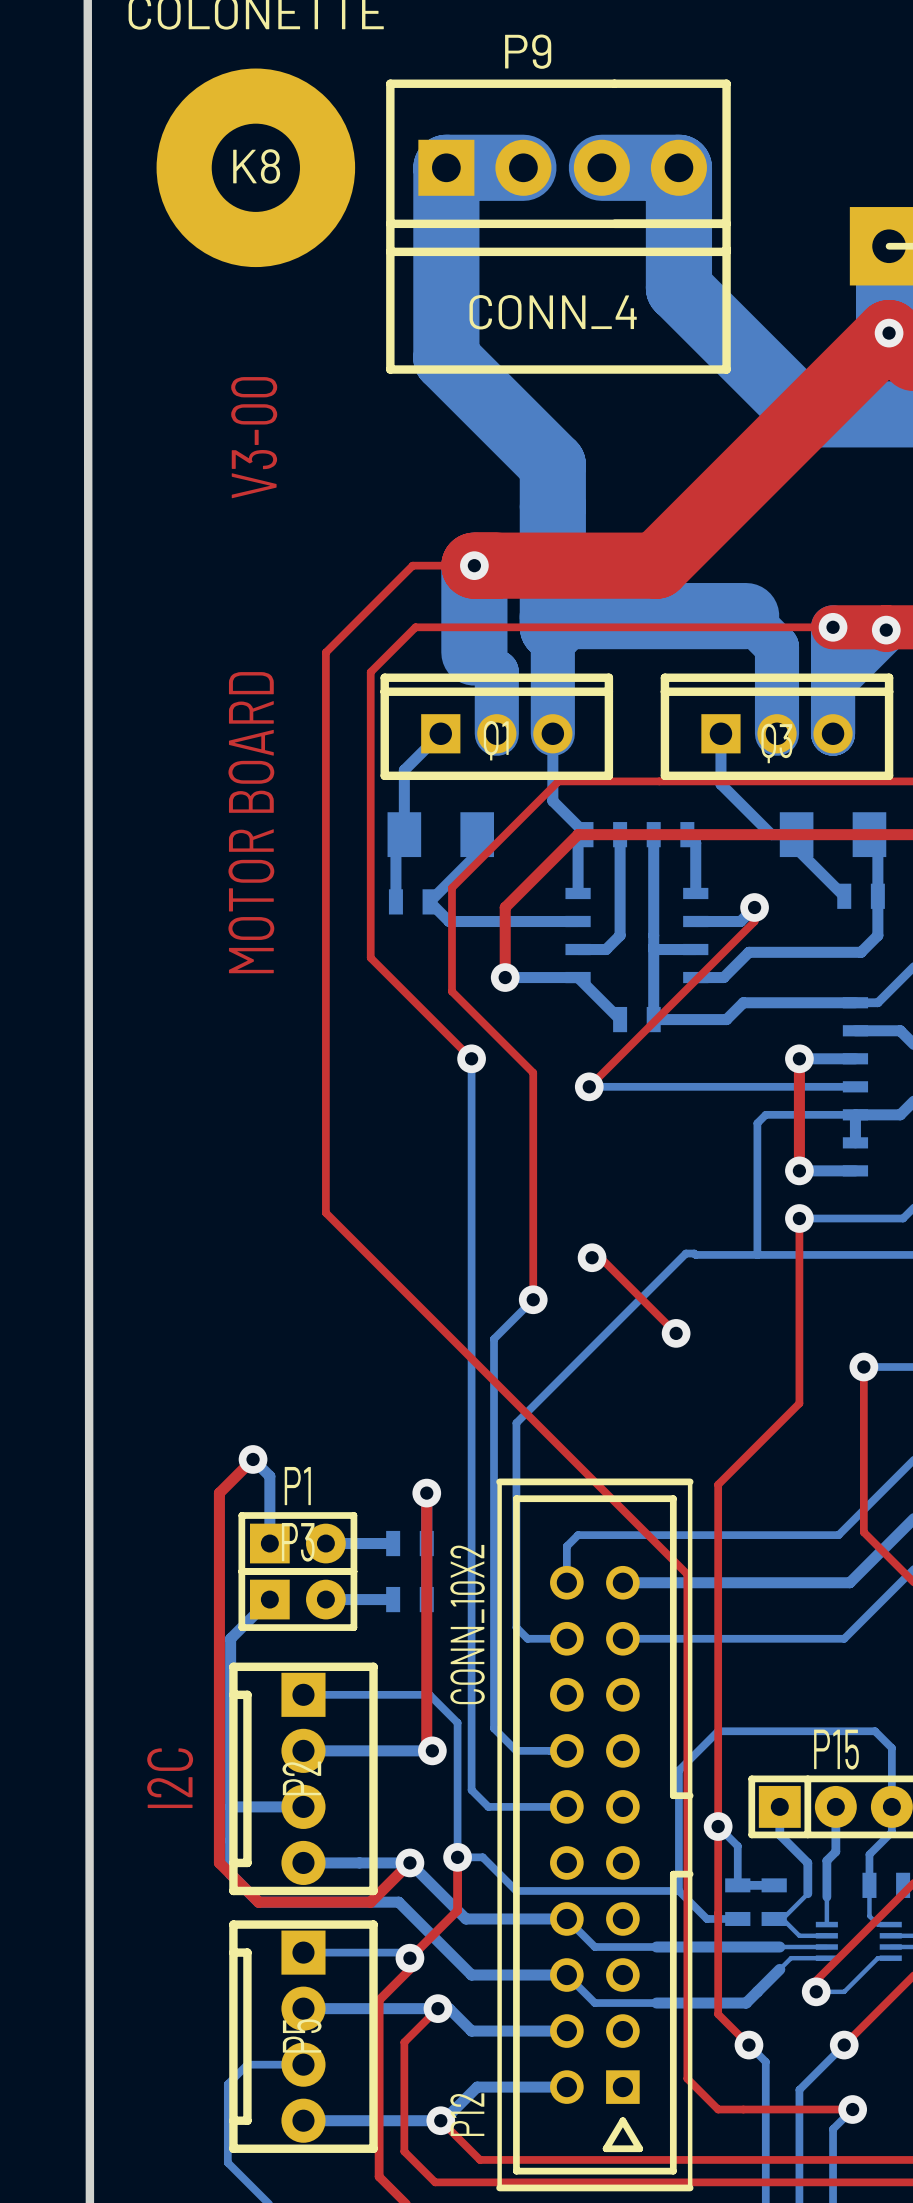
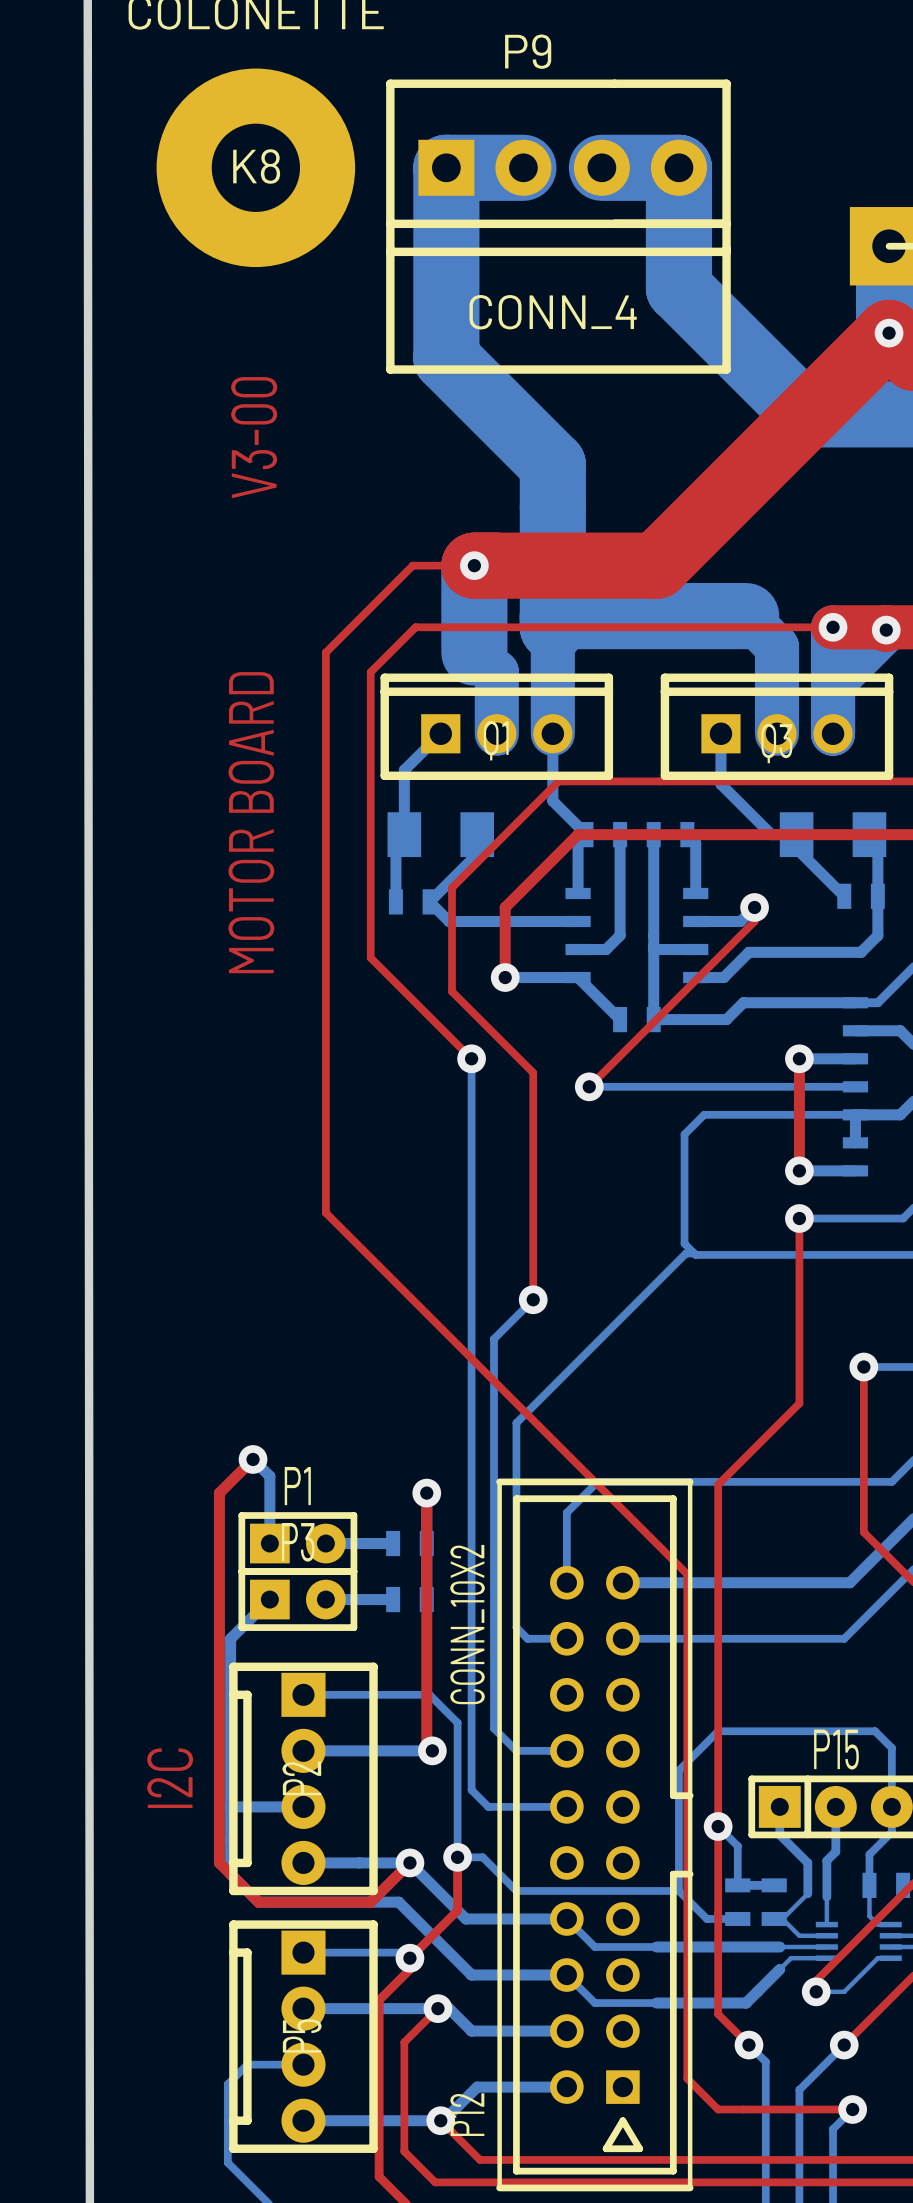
bottom track: (765, 1114) (757, 1123) (757, 1254) -> (765, 1114) (704, 1114) (684, 1134) (684, 1243) (694, 1253)
top track: (592, 1257) (600, 1257) (676, 1333) -> none
via: (592, 1257) -> none
via: (676, 1333) -> none
bottom track: (891, 1481) (838, 1535) (578, 1535) (566, 1546) -> (891, 1481) (597, 1481) (566, 1512) (566, 1546)

